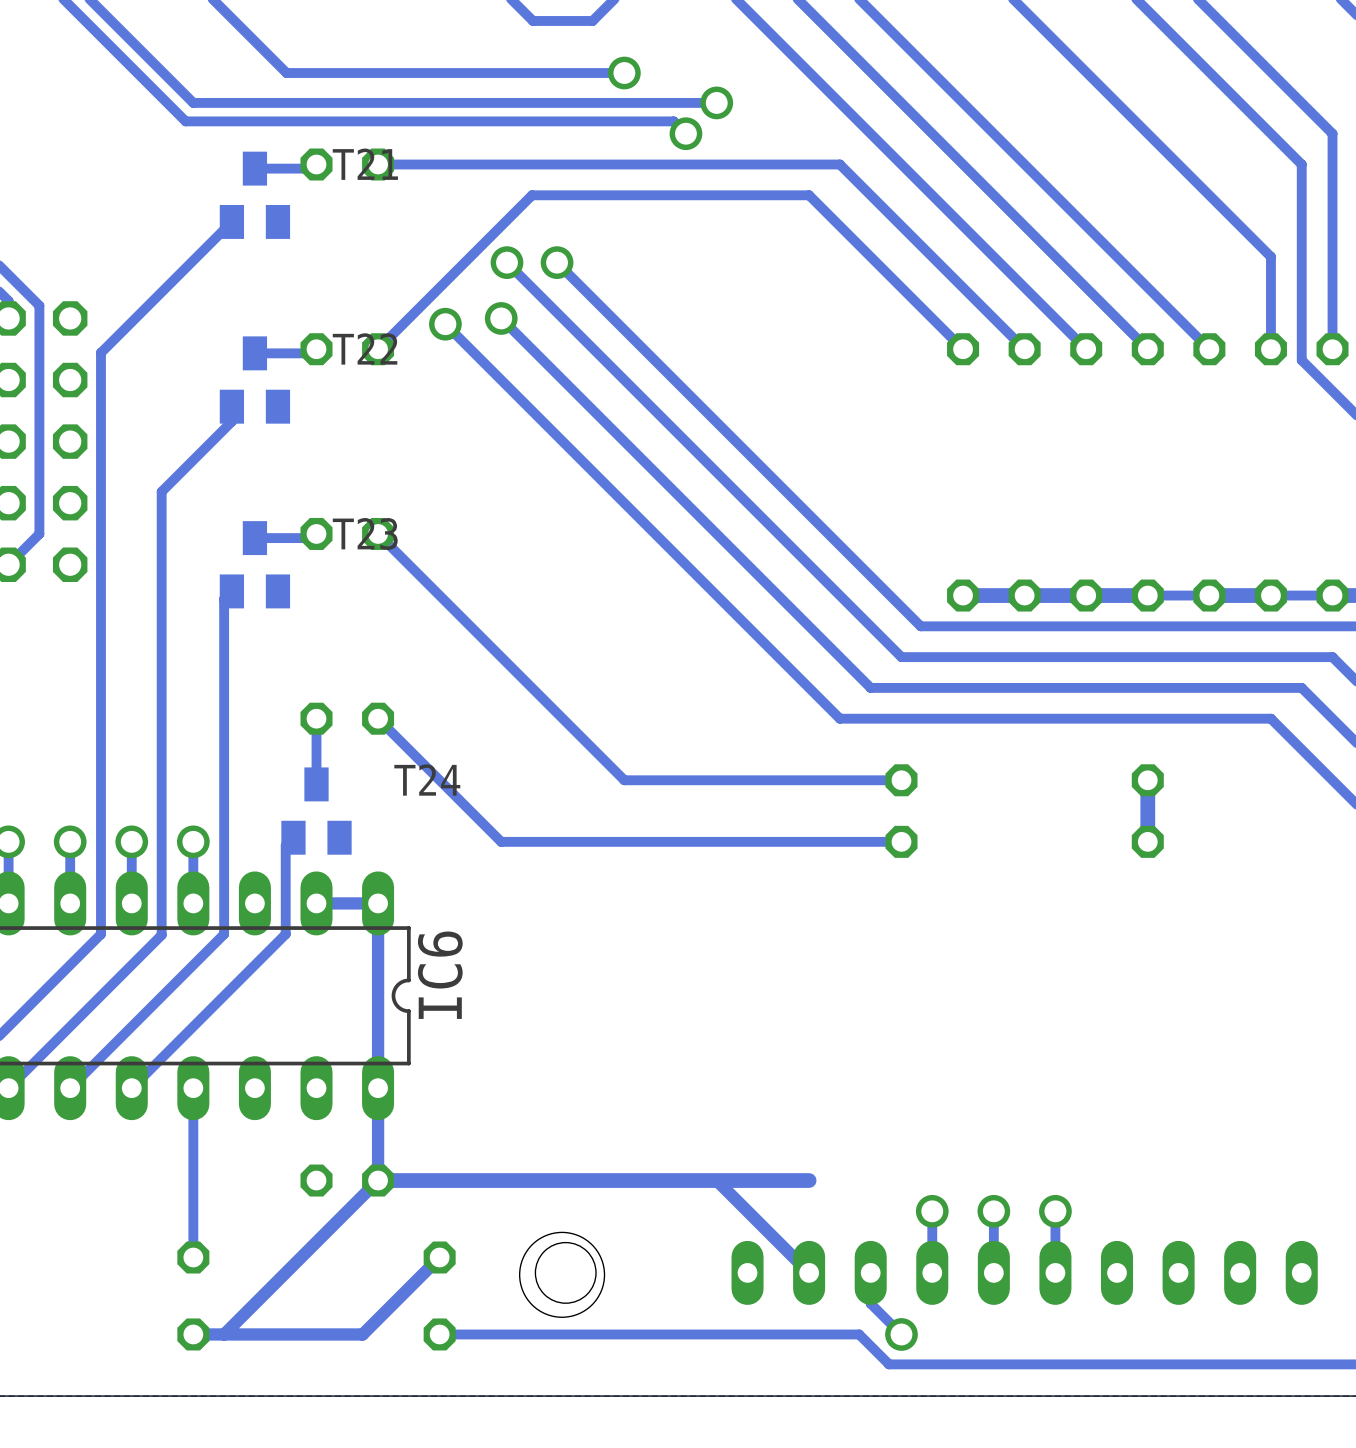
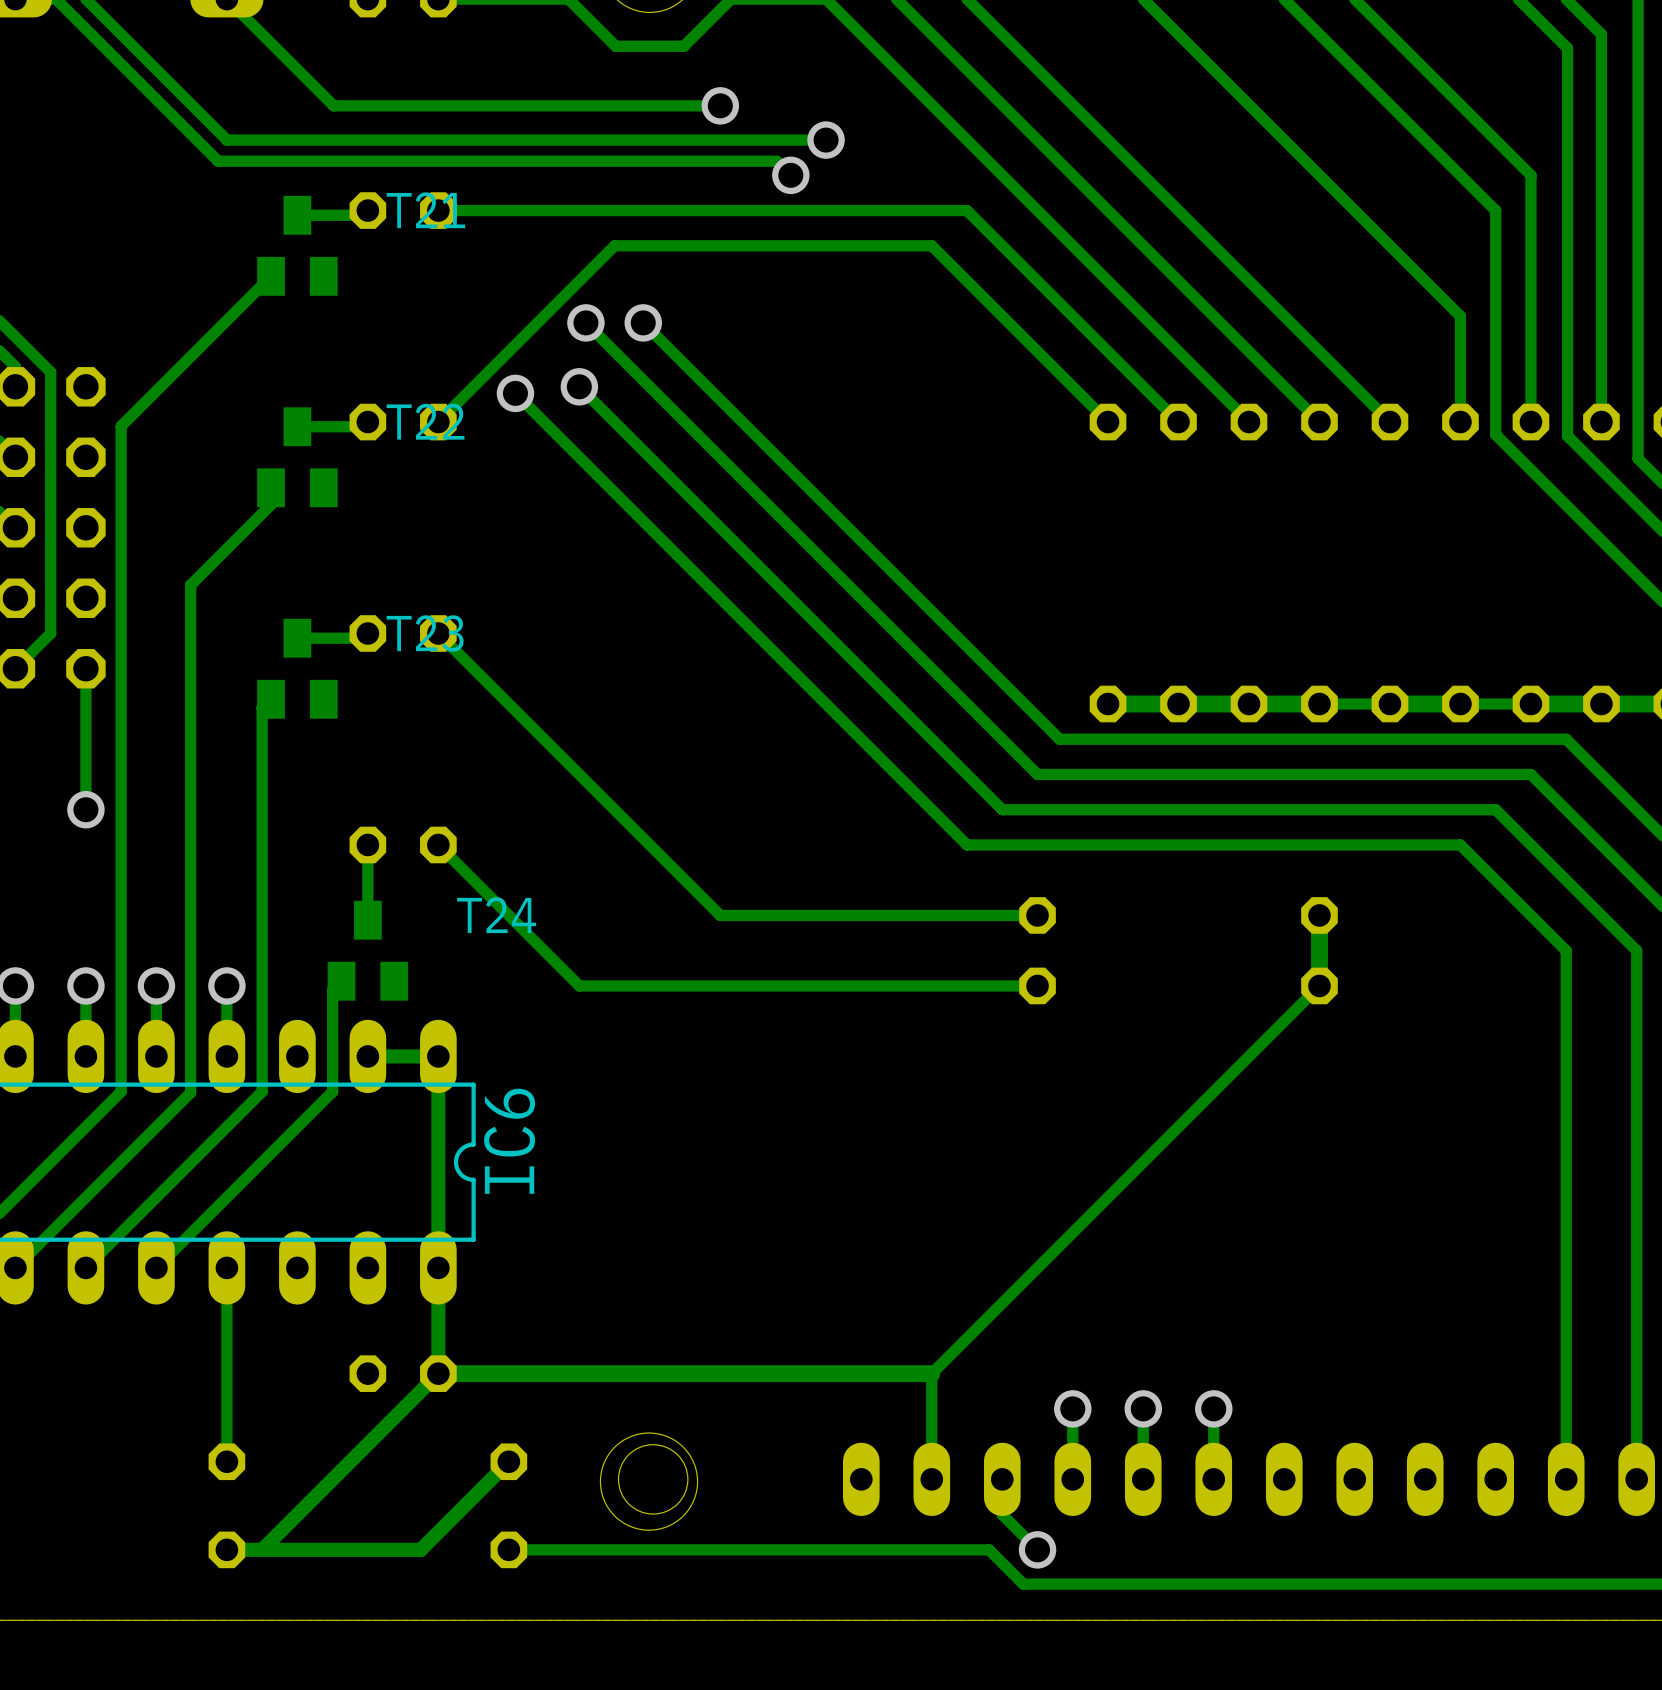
track: none -> (85, 668) (85, 809)
via: none -> (85, 809)
track: (716, 1180) (809, 1272) -> (1319, 985) (931, 1373) (931, 1479)

